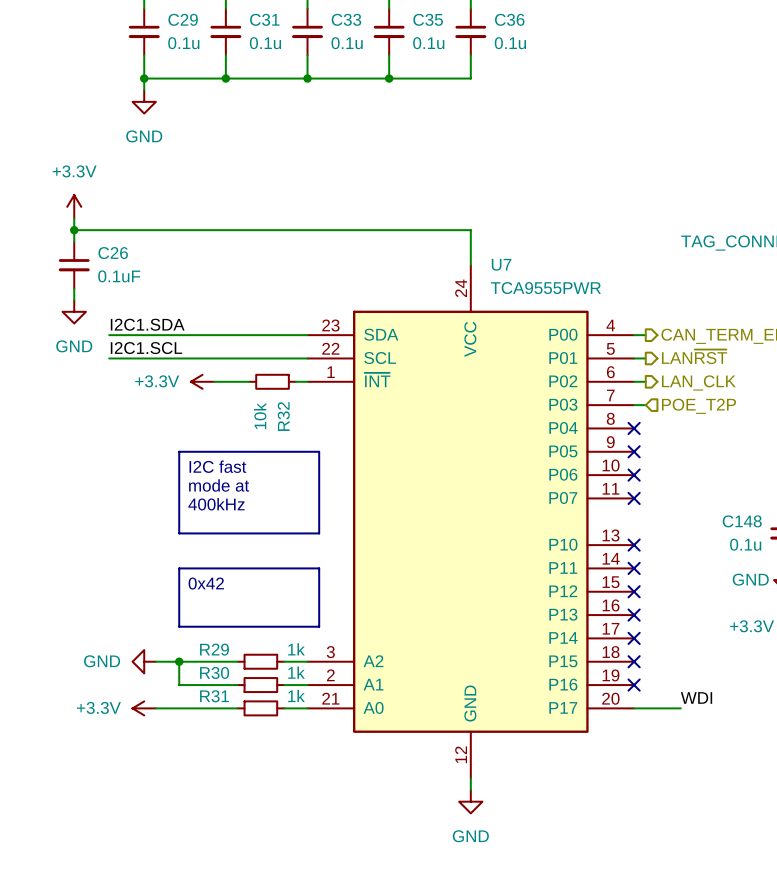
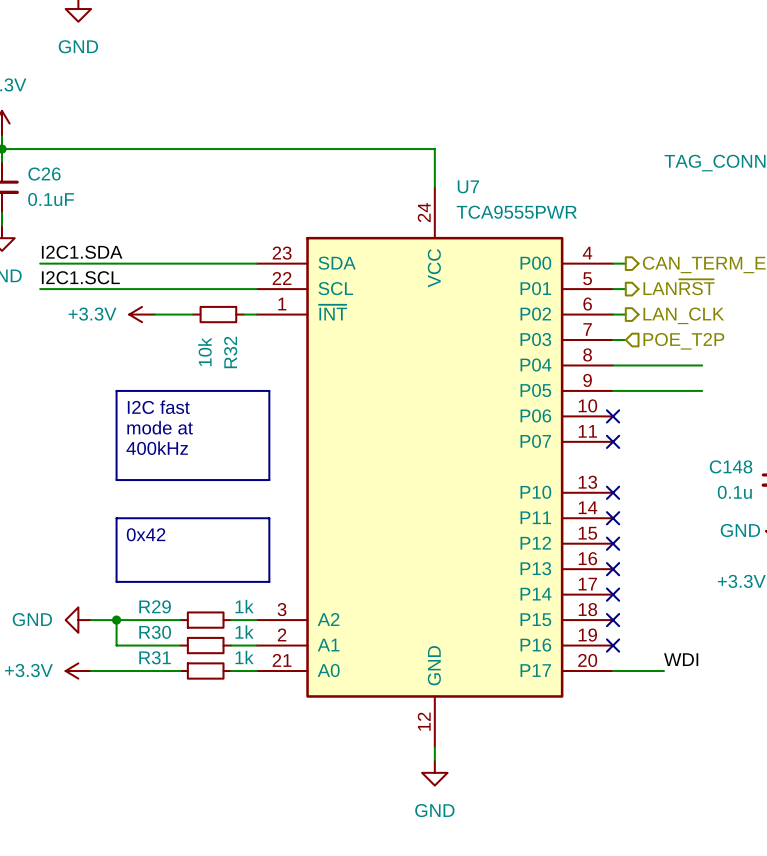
wire: none -> (613, 365) (702, 365)
no-connect mark: (634, 428) -> none
wire: none -> (613, 390) (702, 390)
no-connect mark: (634, 451) -> none

